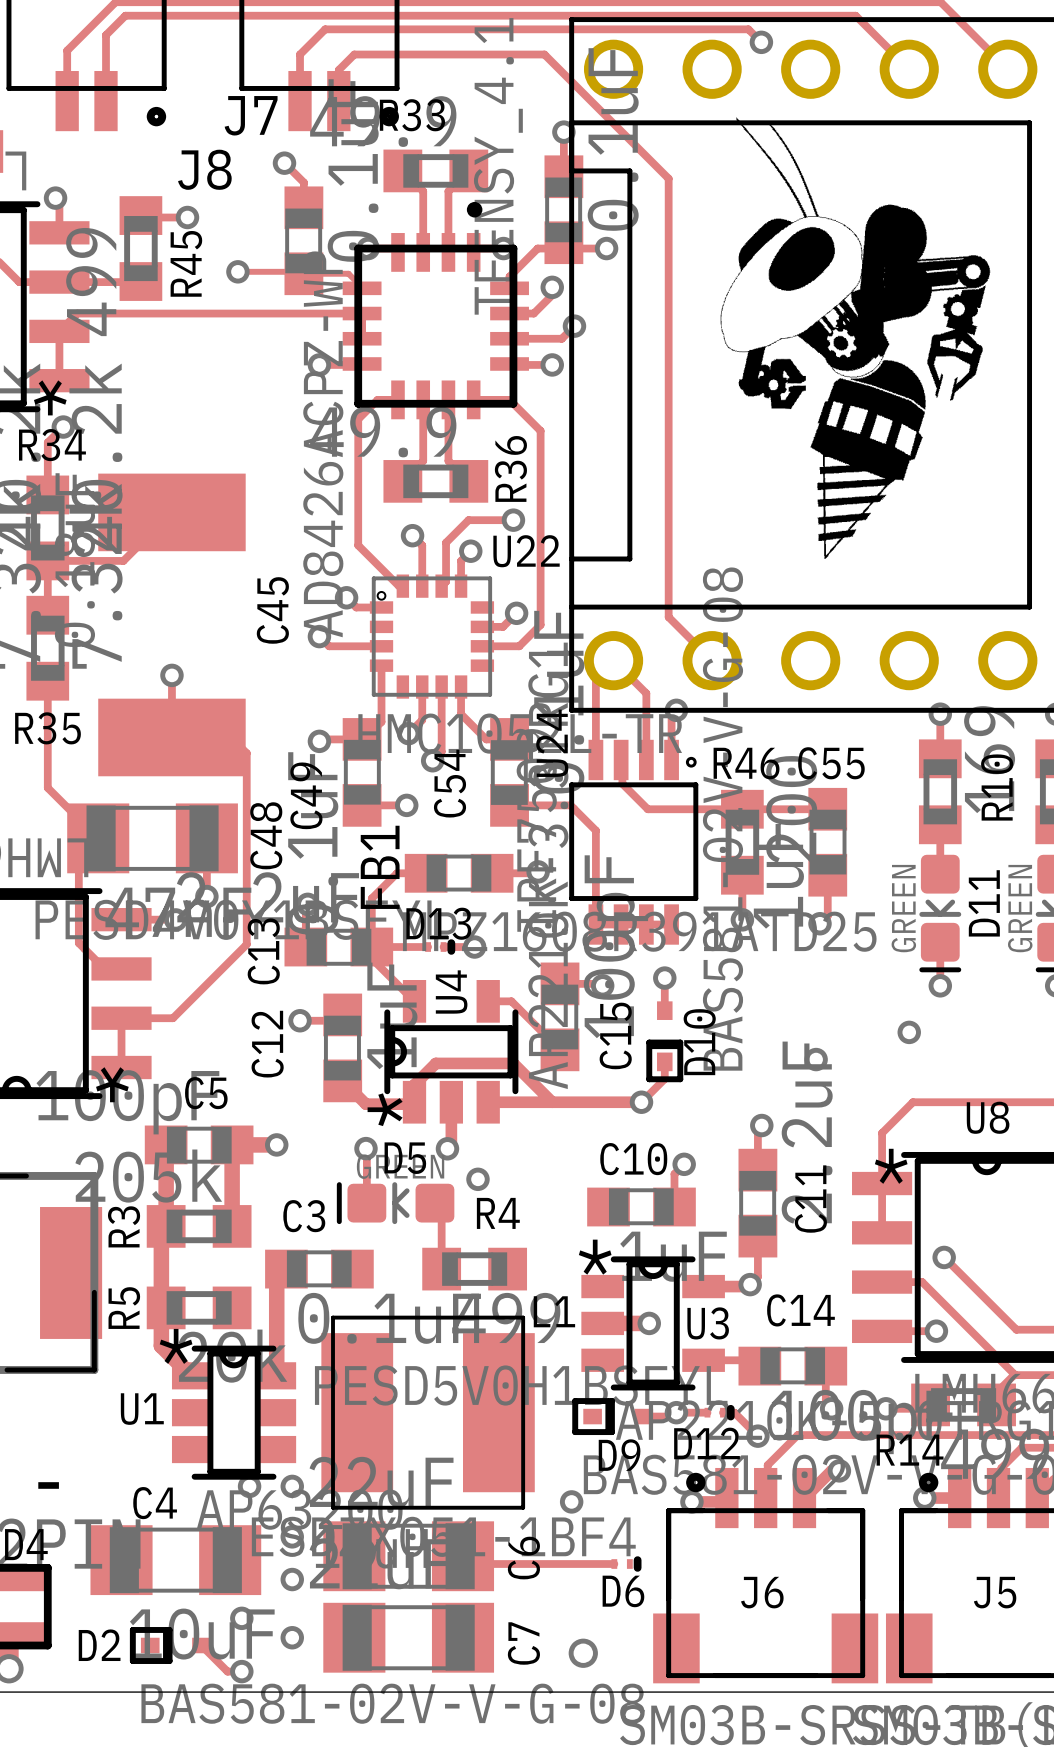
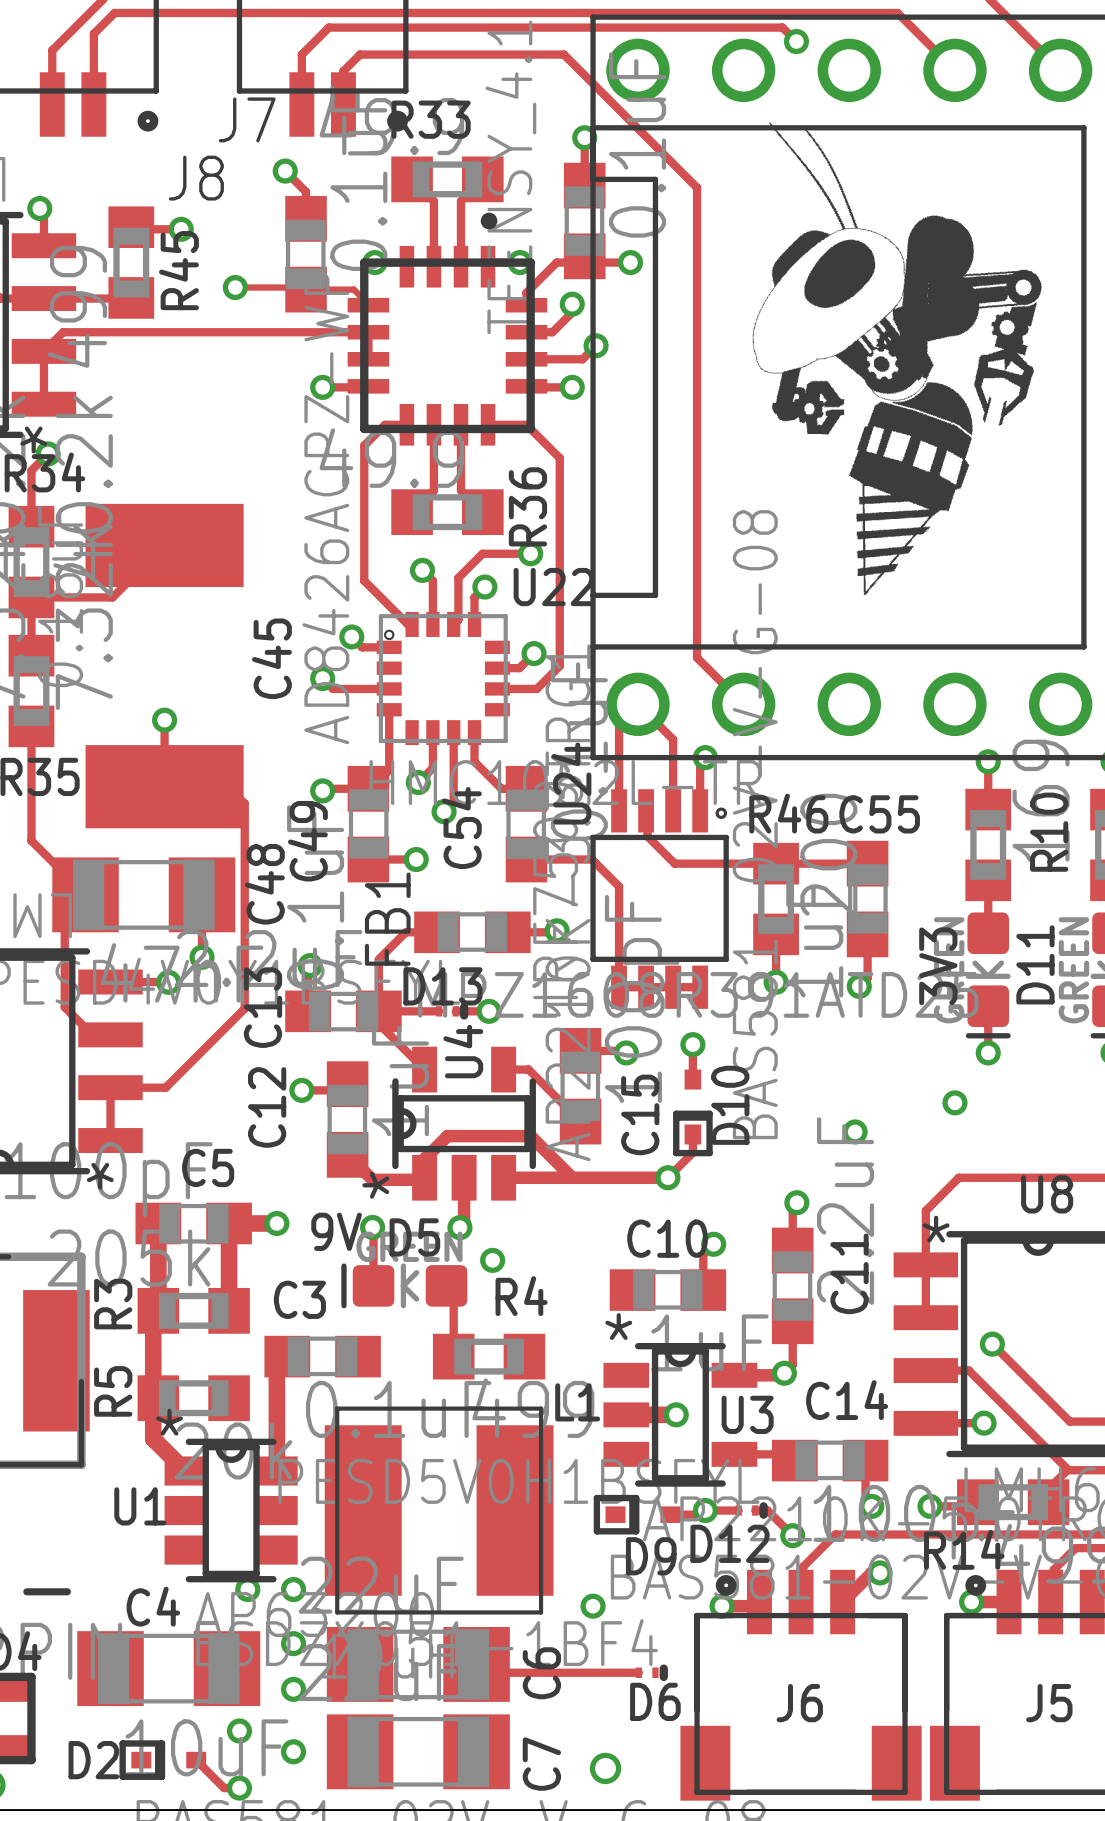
text: none -> 3V3 (938, 966)
text: none -> 9V (336, 1231)

